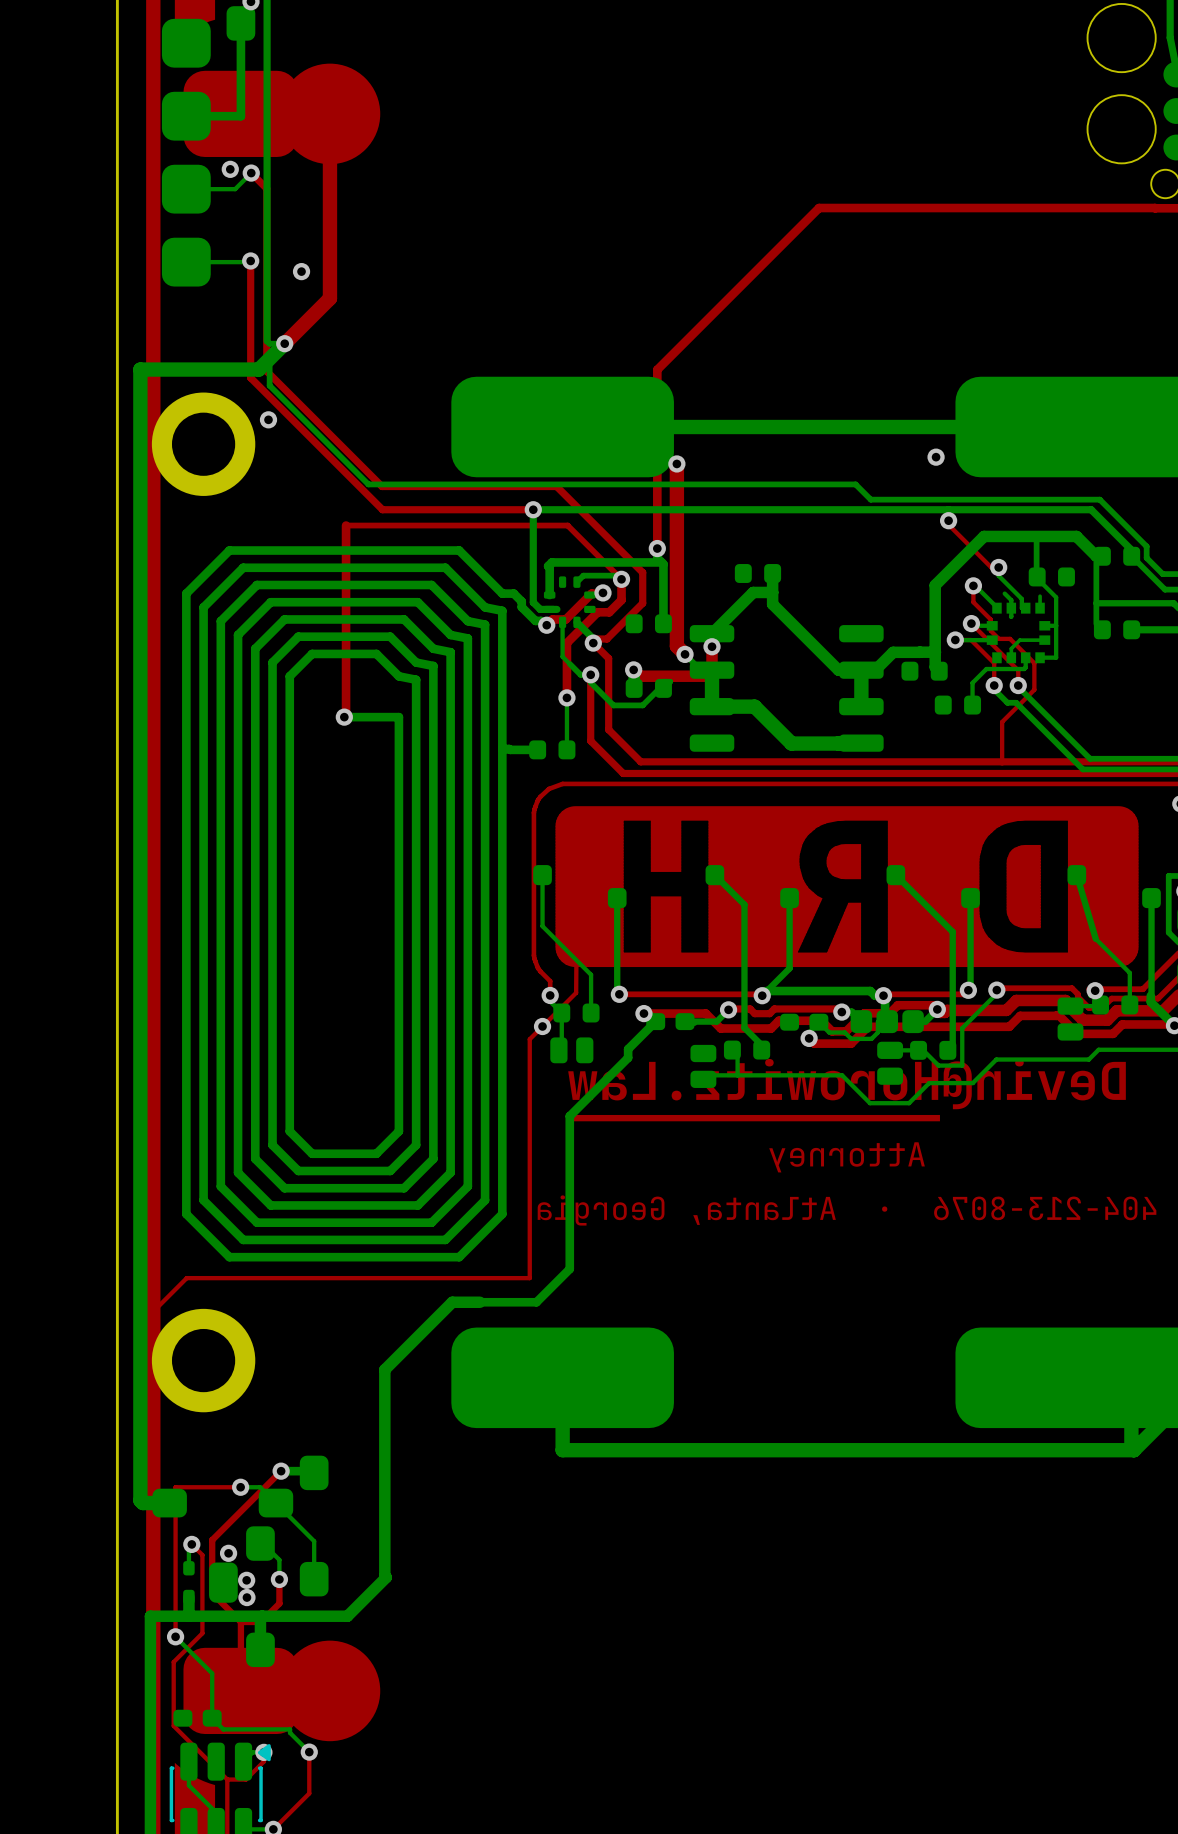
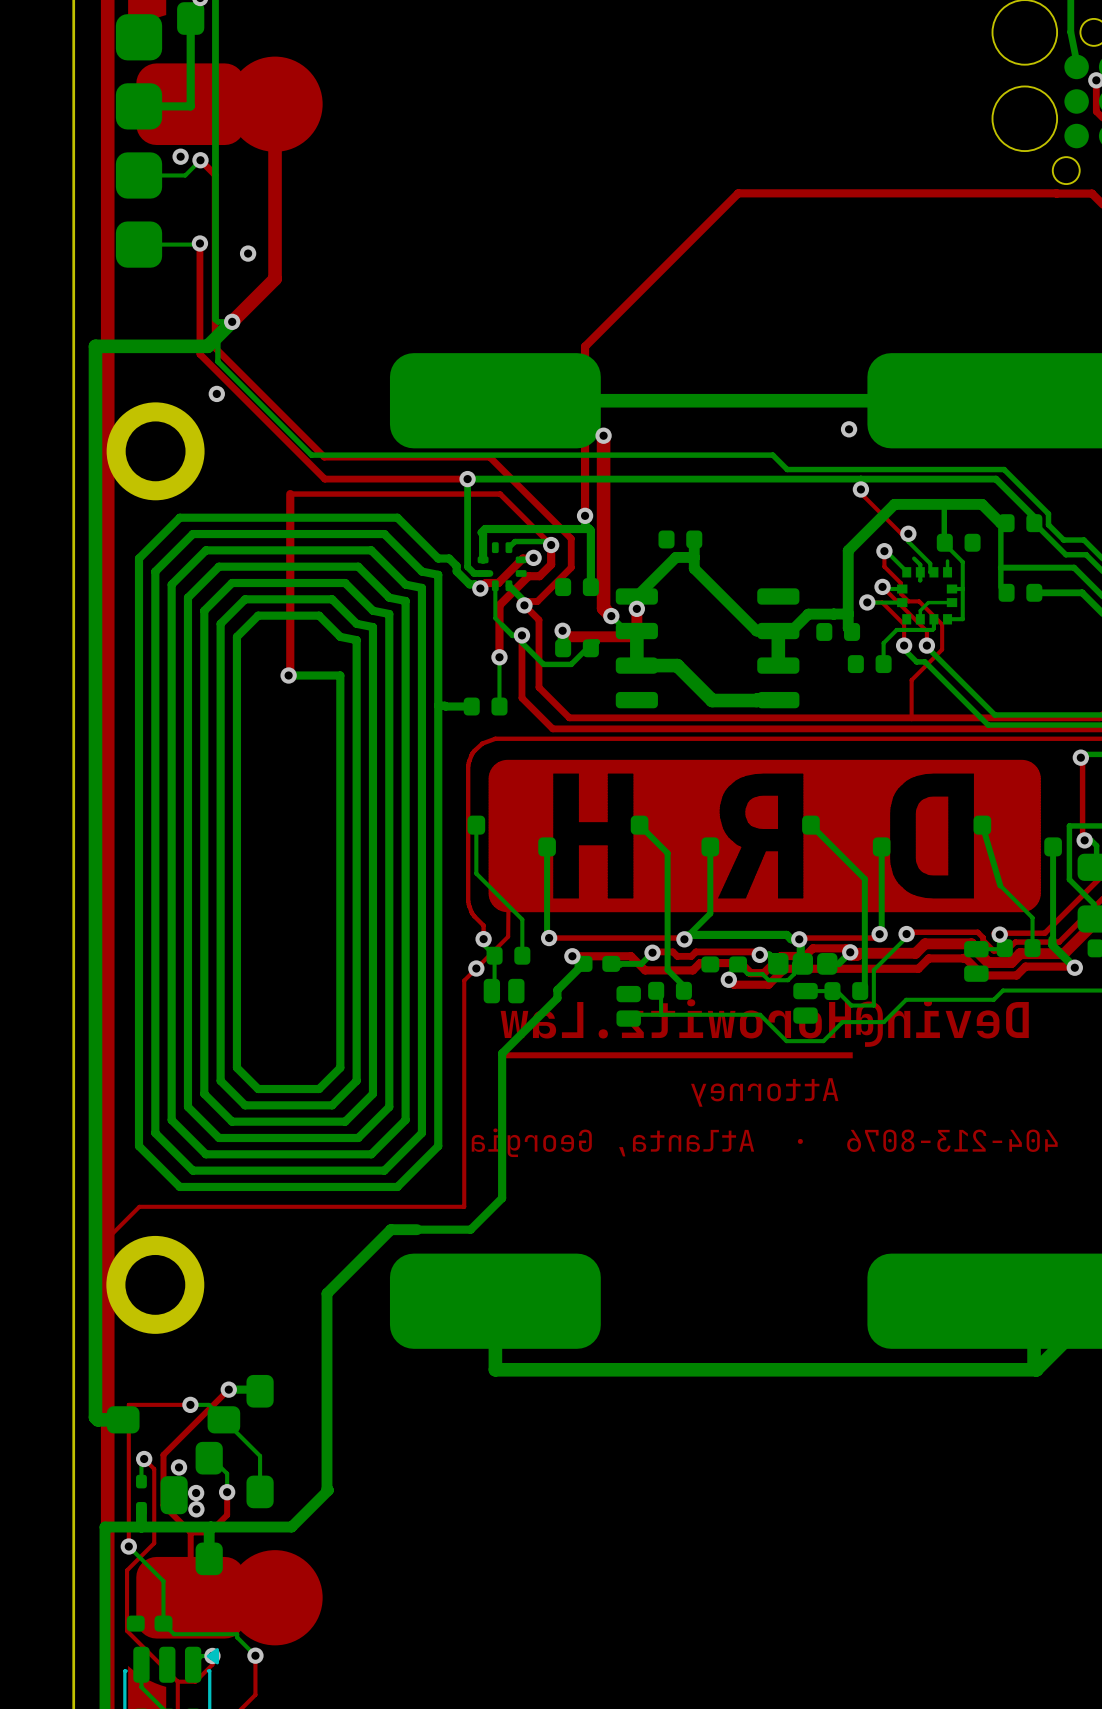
part position: (203, 444) -> (155, 451)

